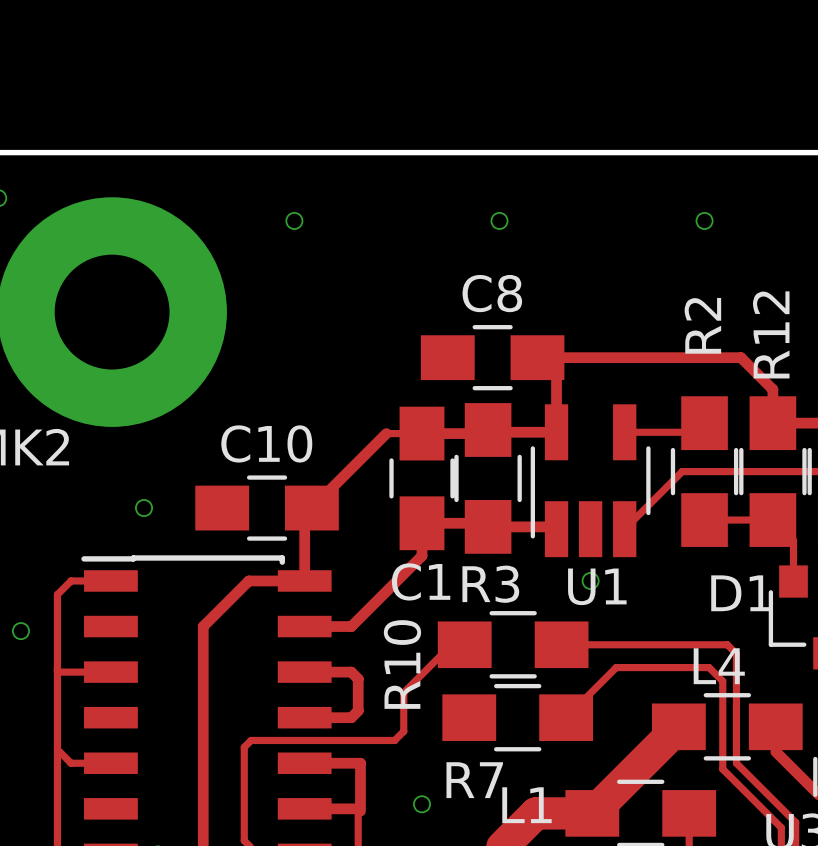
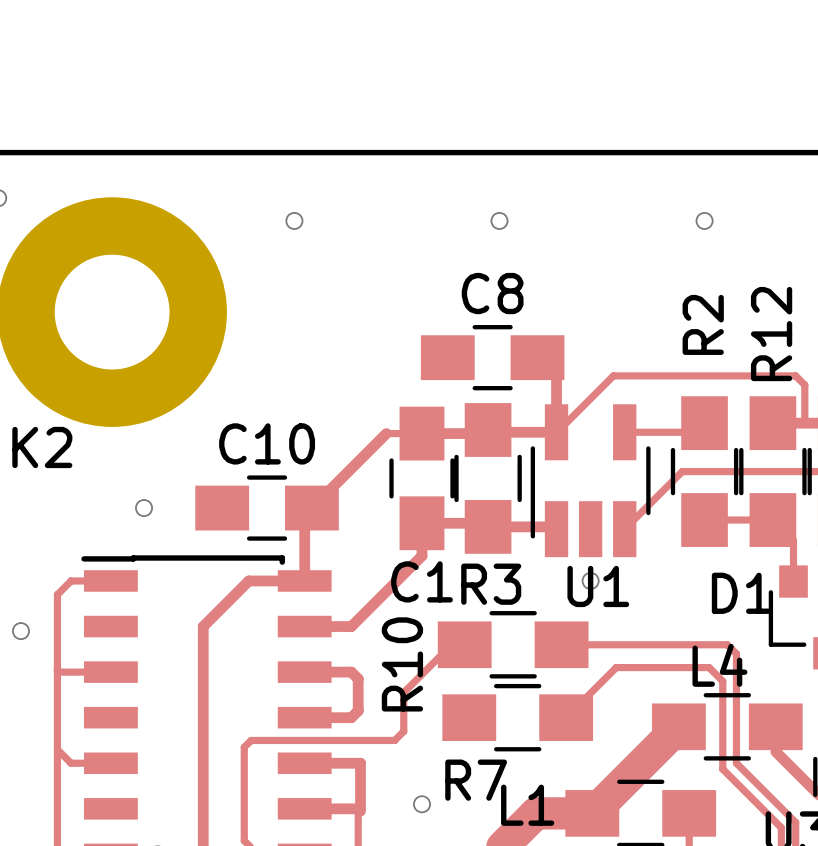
track: (555, 375) (537, 357) (741, 357) (772, 389) (772, 423) -> none
track: none -> (804, 423) (804, 385) (795, 375) (613, 375) (557, 432)

